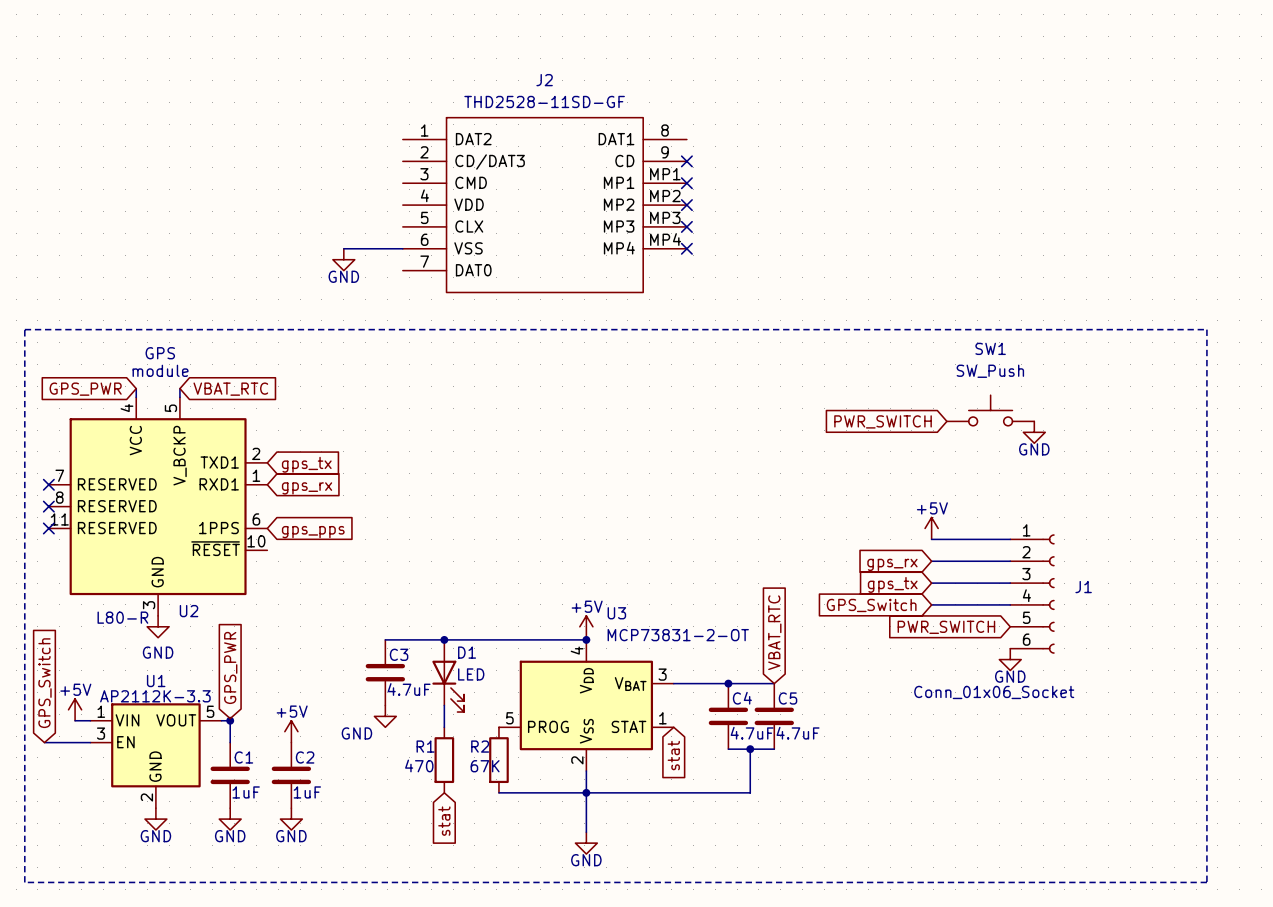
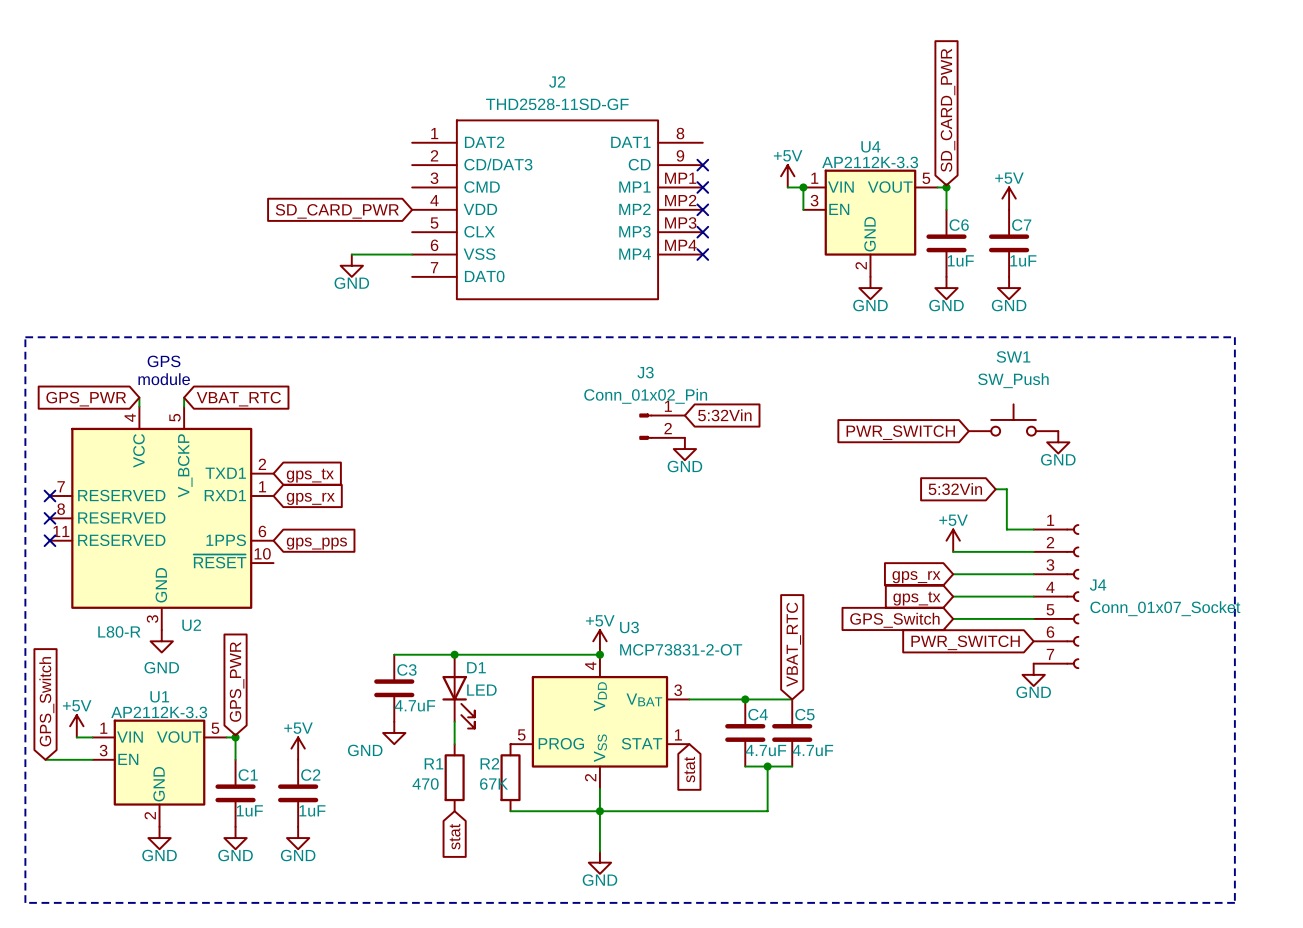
global label: none -> SD_CARD_PWR (948, 110)
power symbol: none -> +5V (787, 176)
wire: none -> (946, 185) (946, 209)
wire: none -> (787, 187) (803, 187) (803, 209)
junction: none -> (803, 187)
wire: none -> (937, 187) (946, 187)
junction: none -> (946, 187)
power symbol: none -> +5V (1009, 198)
global label: none -> SD_CARD_PWR (337, 211)
U4: none -> AP2112K-3.3 (870, 223)
C6: none -> 1uF (946, 243)
C7: none -> 1uF (1009, 243)
power symbol: none -> GND (870, 288)
power symbol: none -> GND (946, 288)
power symbol: none -> GND (1009, 288)
global label: none -> 5:32Vin (724, 415)
J3: none -> Conn_01x02_Pin (662, 426)
power symbol: none -> GND (684, 449)
global label: none -> 5:32Vin (955, 489)
wire: none -> (995, 489) (1006, 489) (1006, 529) (1033, 529)
J4: none -> Conn_01x07_Socket (1056, 596)
J1: Conn_01x06_Socket (1032, 594) -> none

